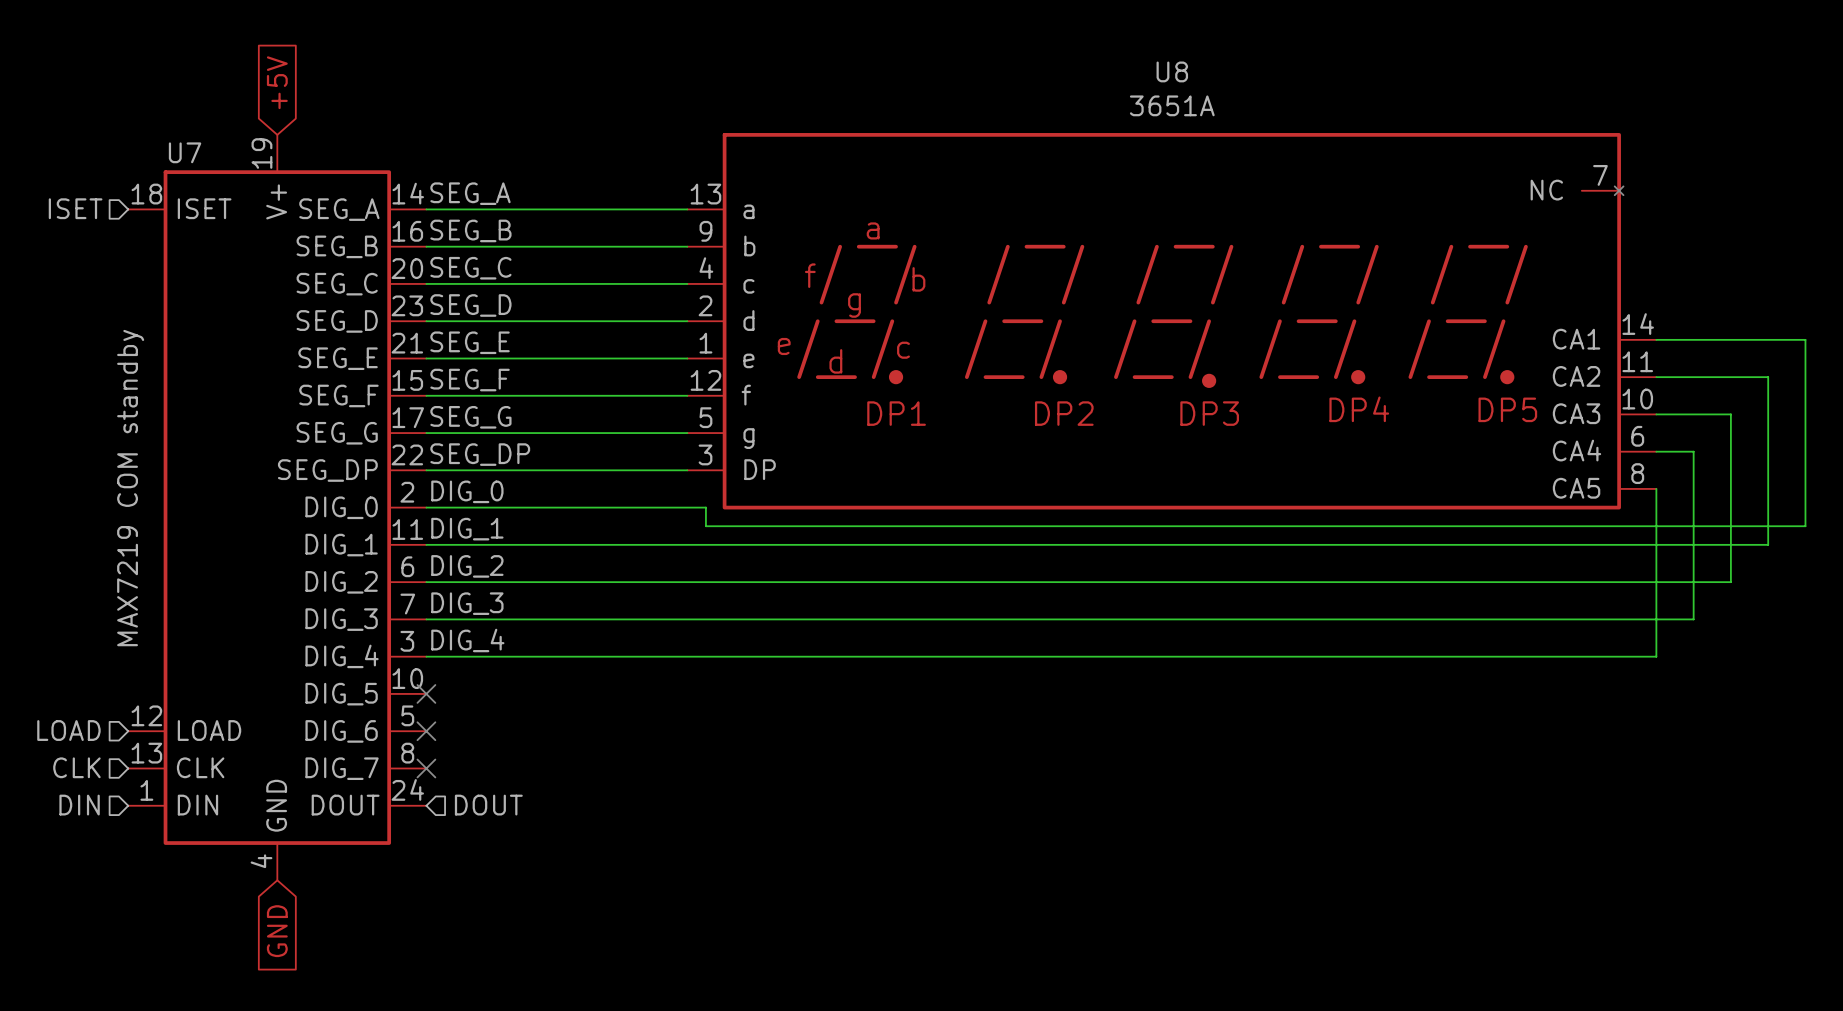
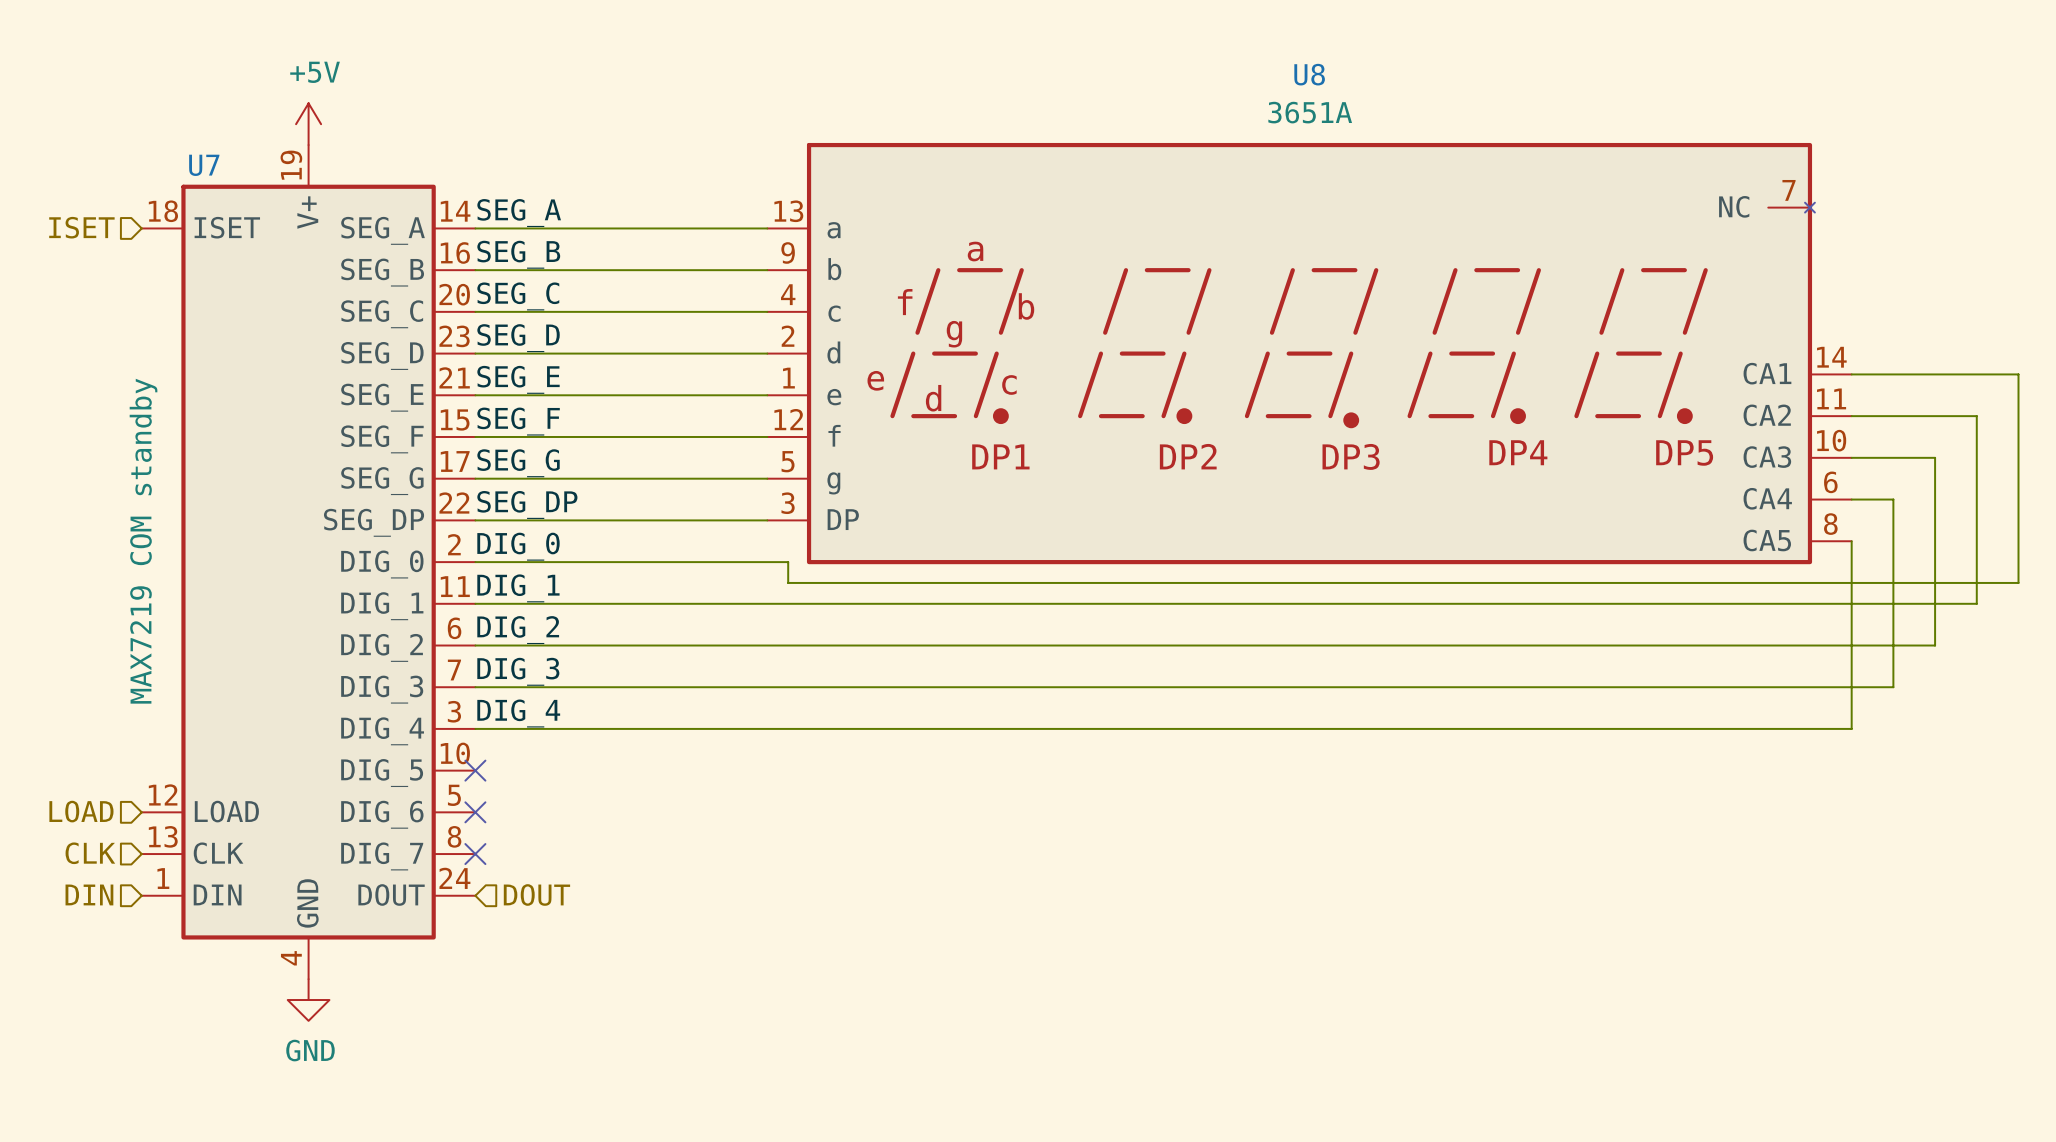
global label: +5V (277, 82) -> none
power symbol: none -> +5V (308, 124)
power symbol: none -> GND (308, 1000)
global label: GND (277, 931) -> none

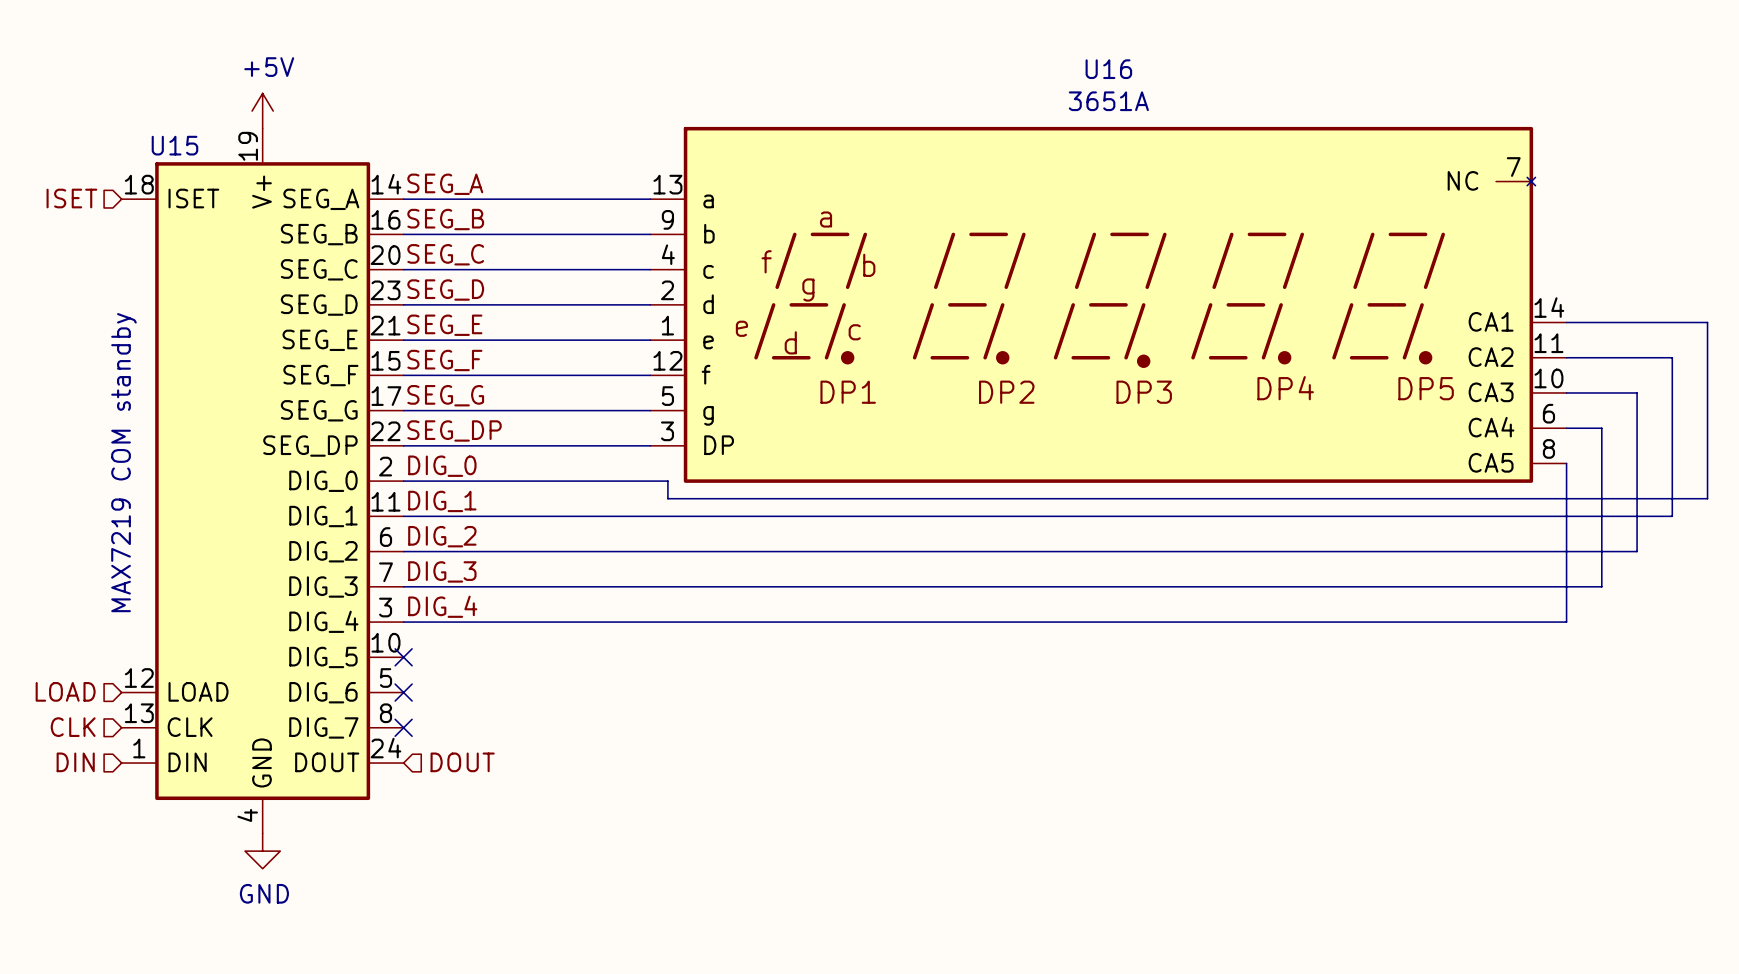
U8 name: U8 (1309, 74) -> U16 (1108, 69)
U7 name: U7 (204, 165) -> U15 (174, 145)

